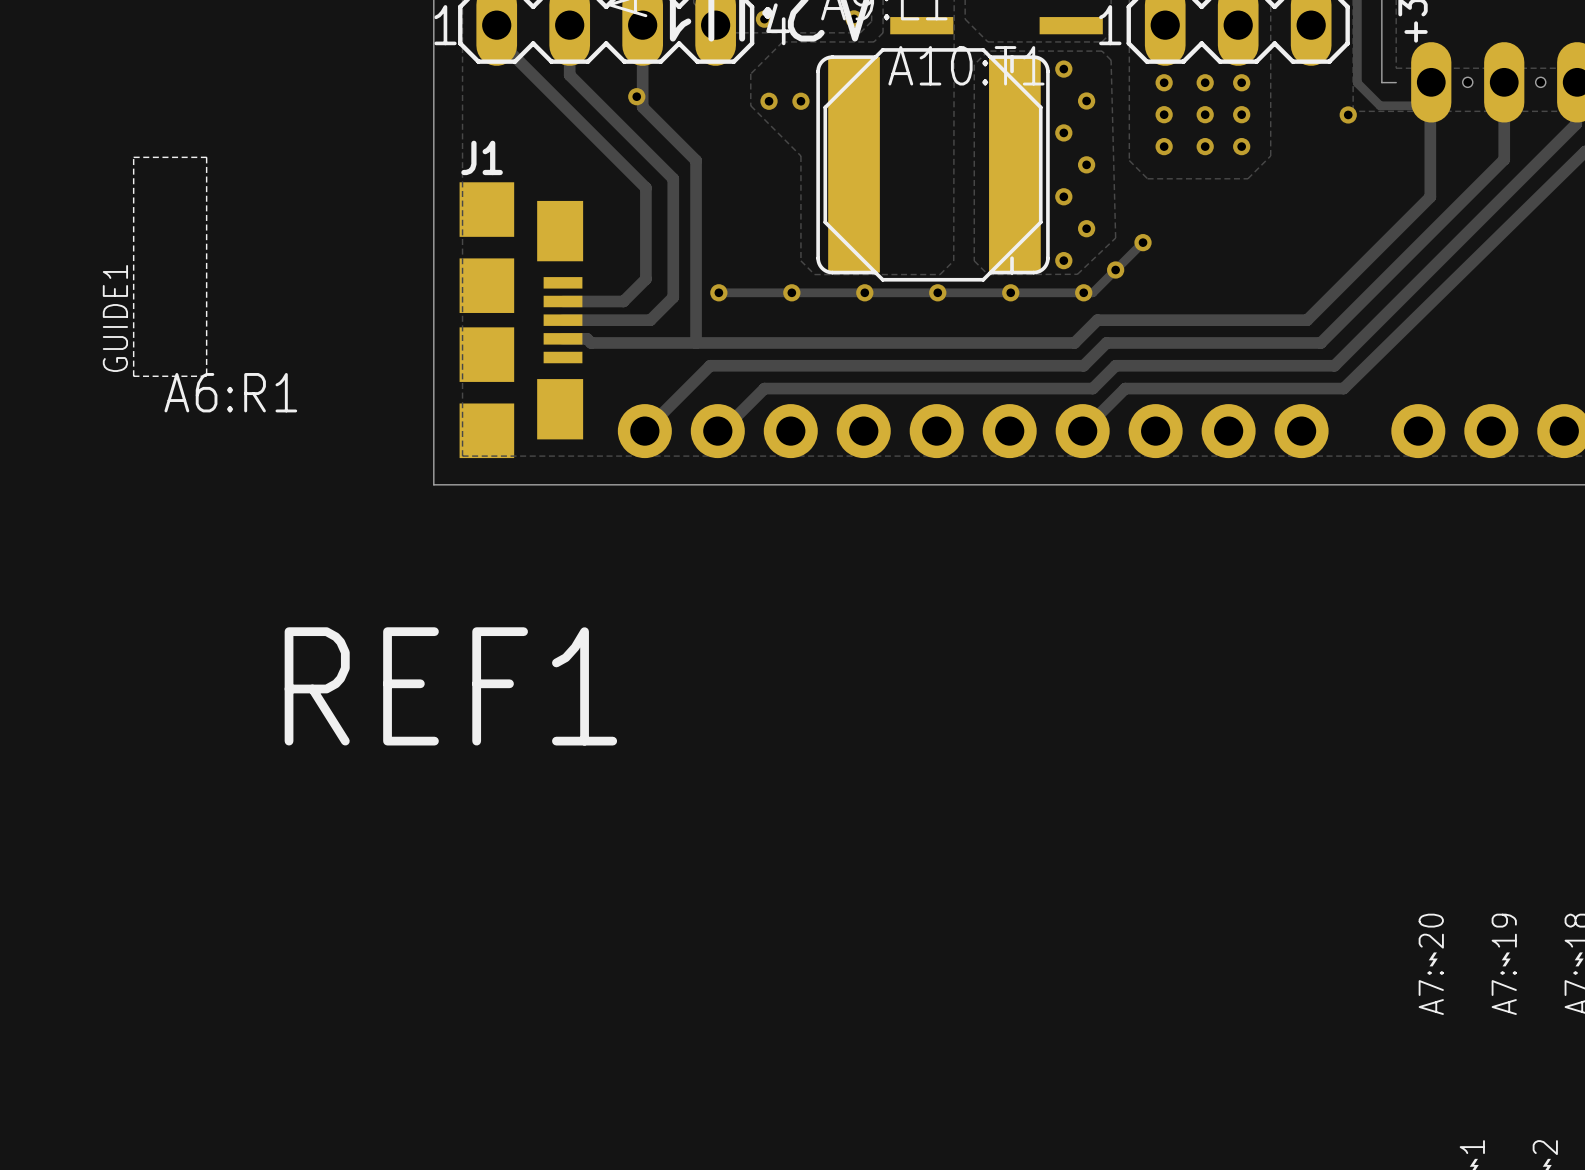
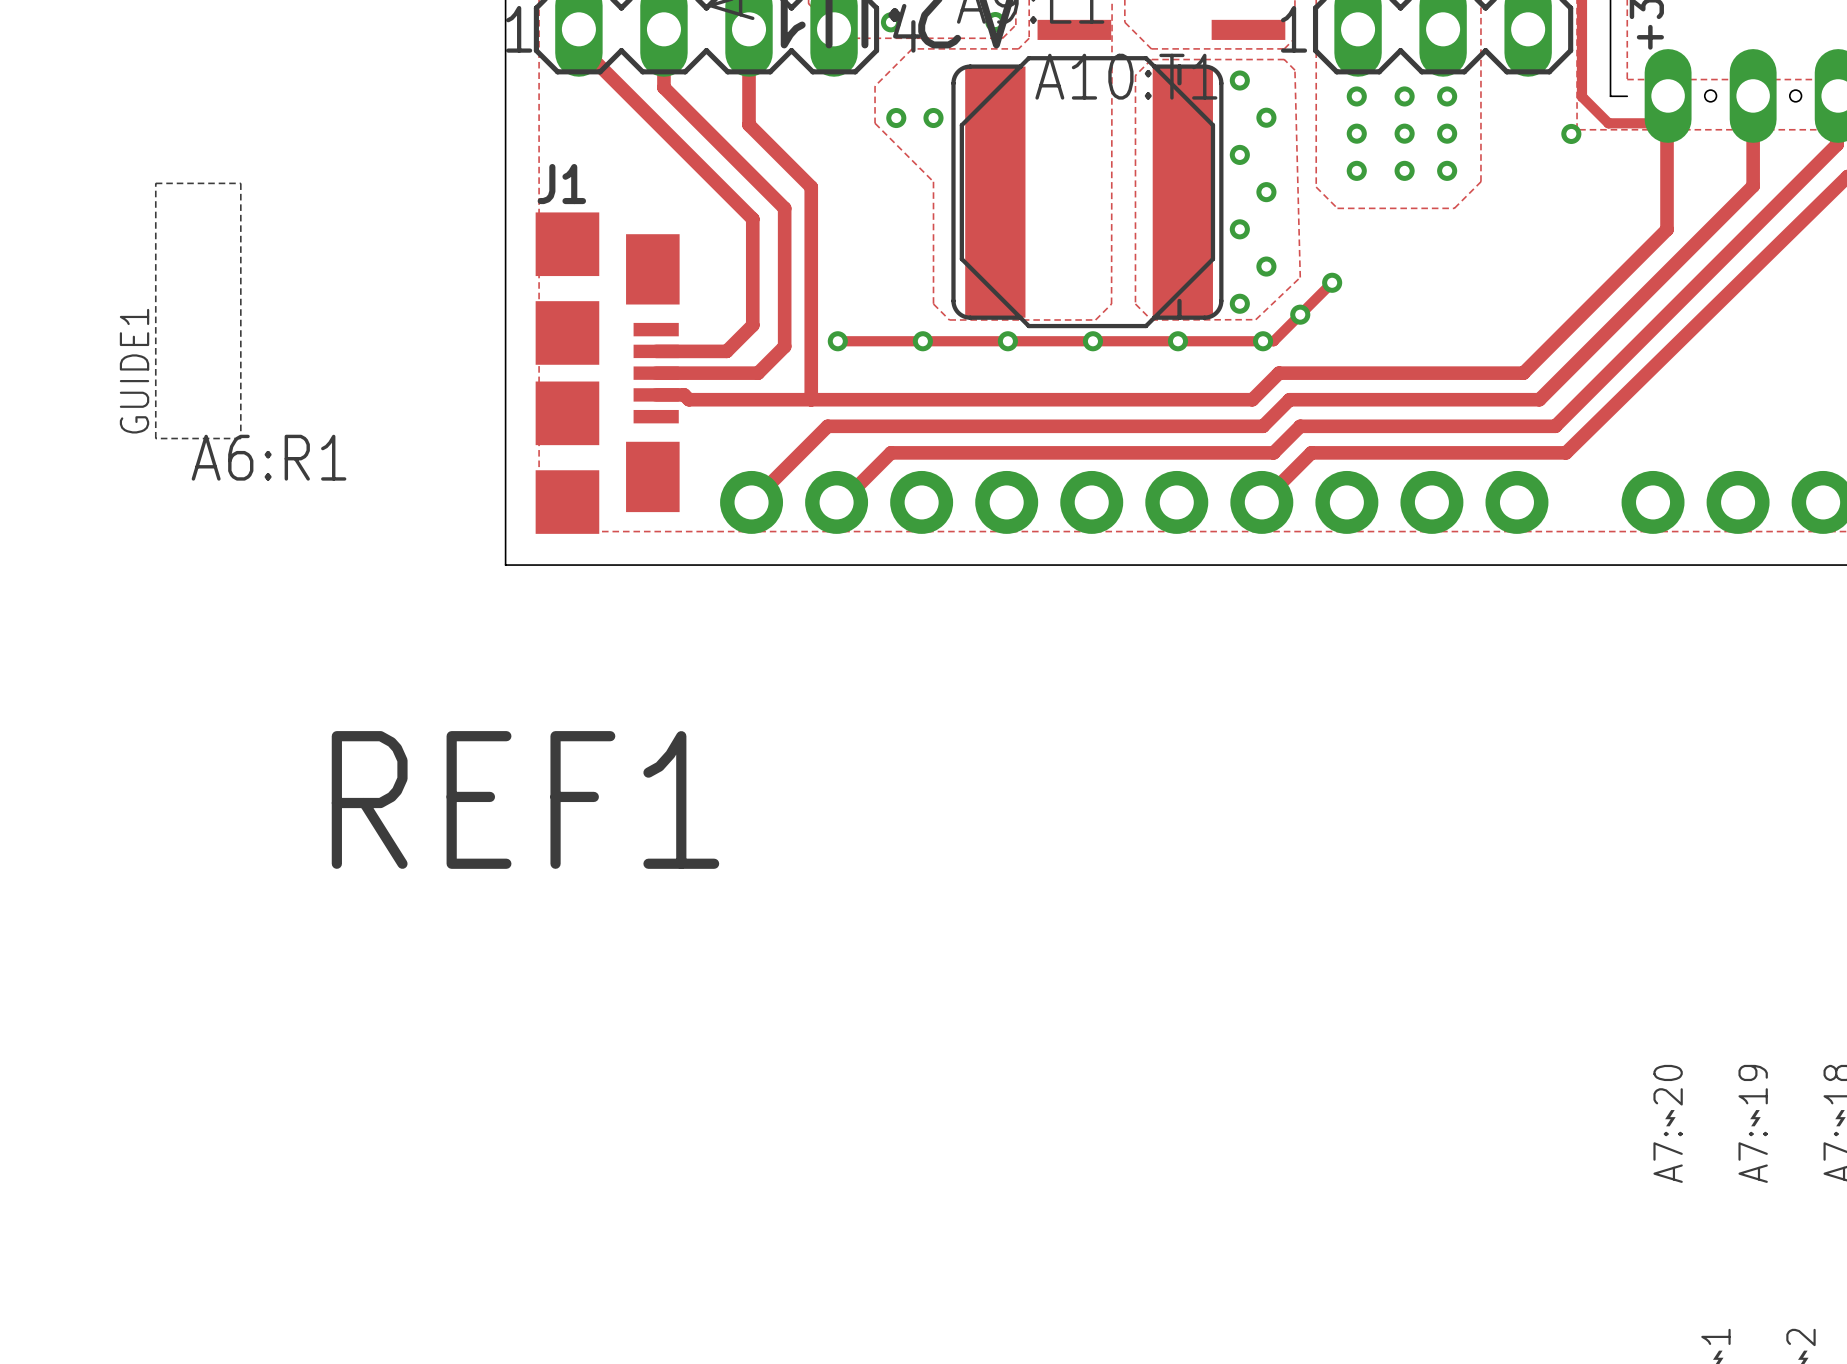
via: (636, 96) -> none

